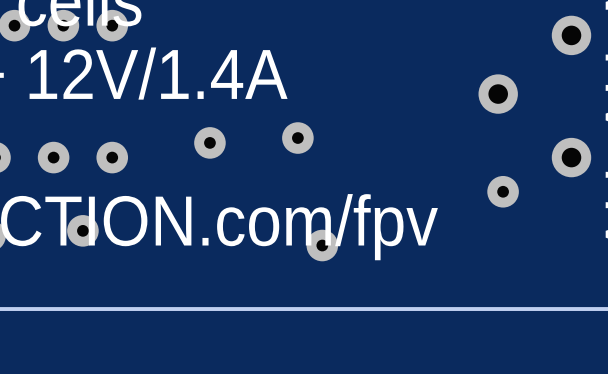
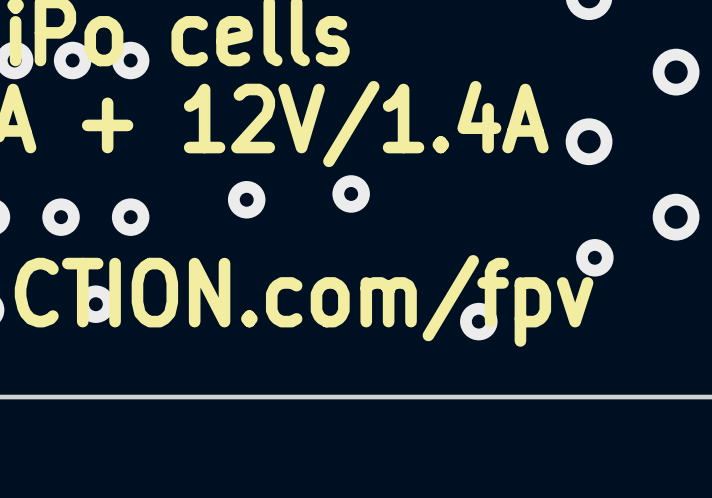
via position: (322, 245) -> (478, 321)

